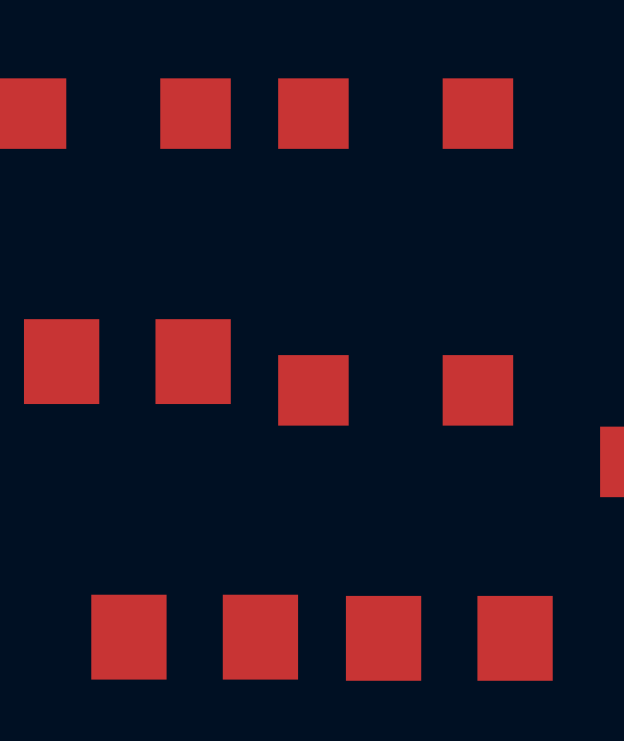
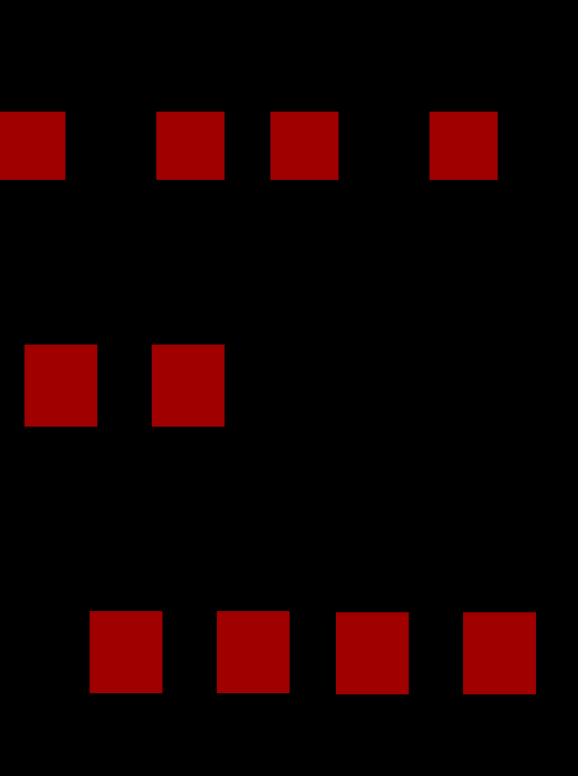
part: (395, 390) -> none

